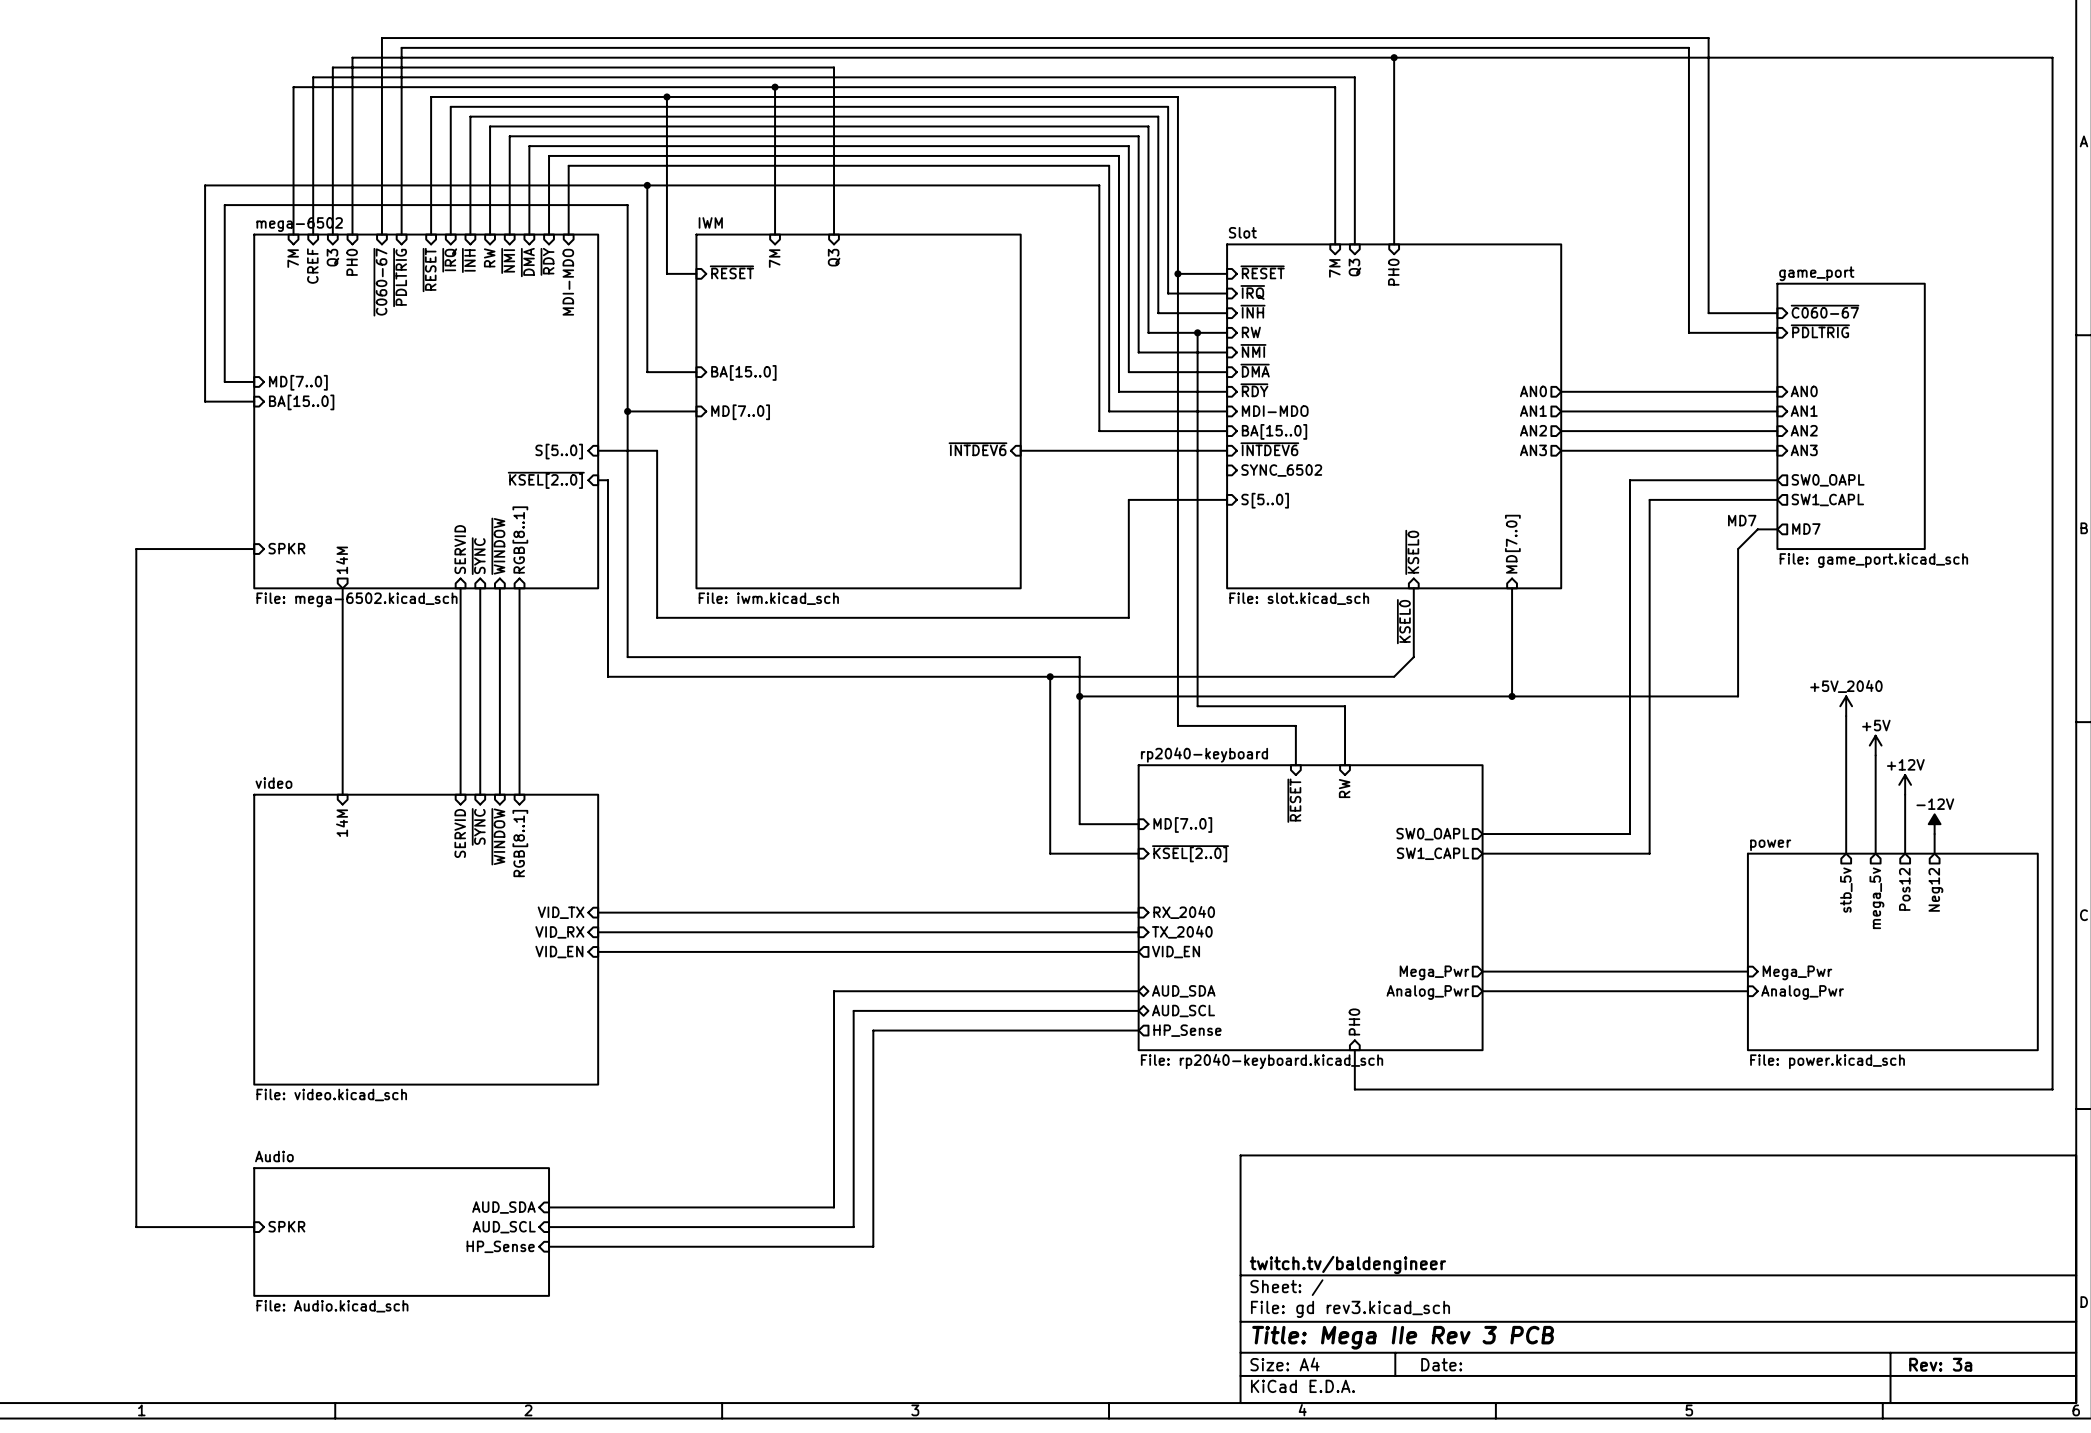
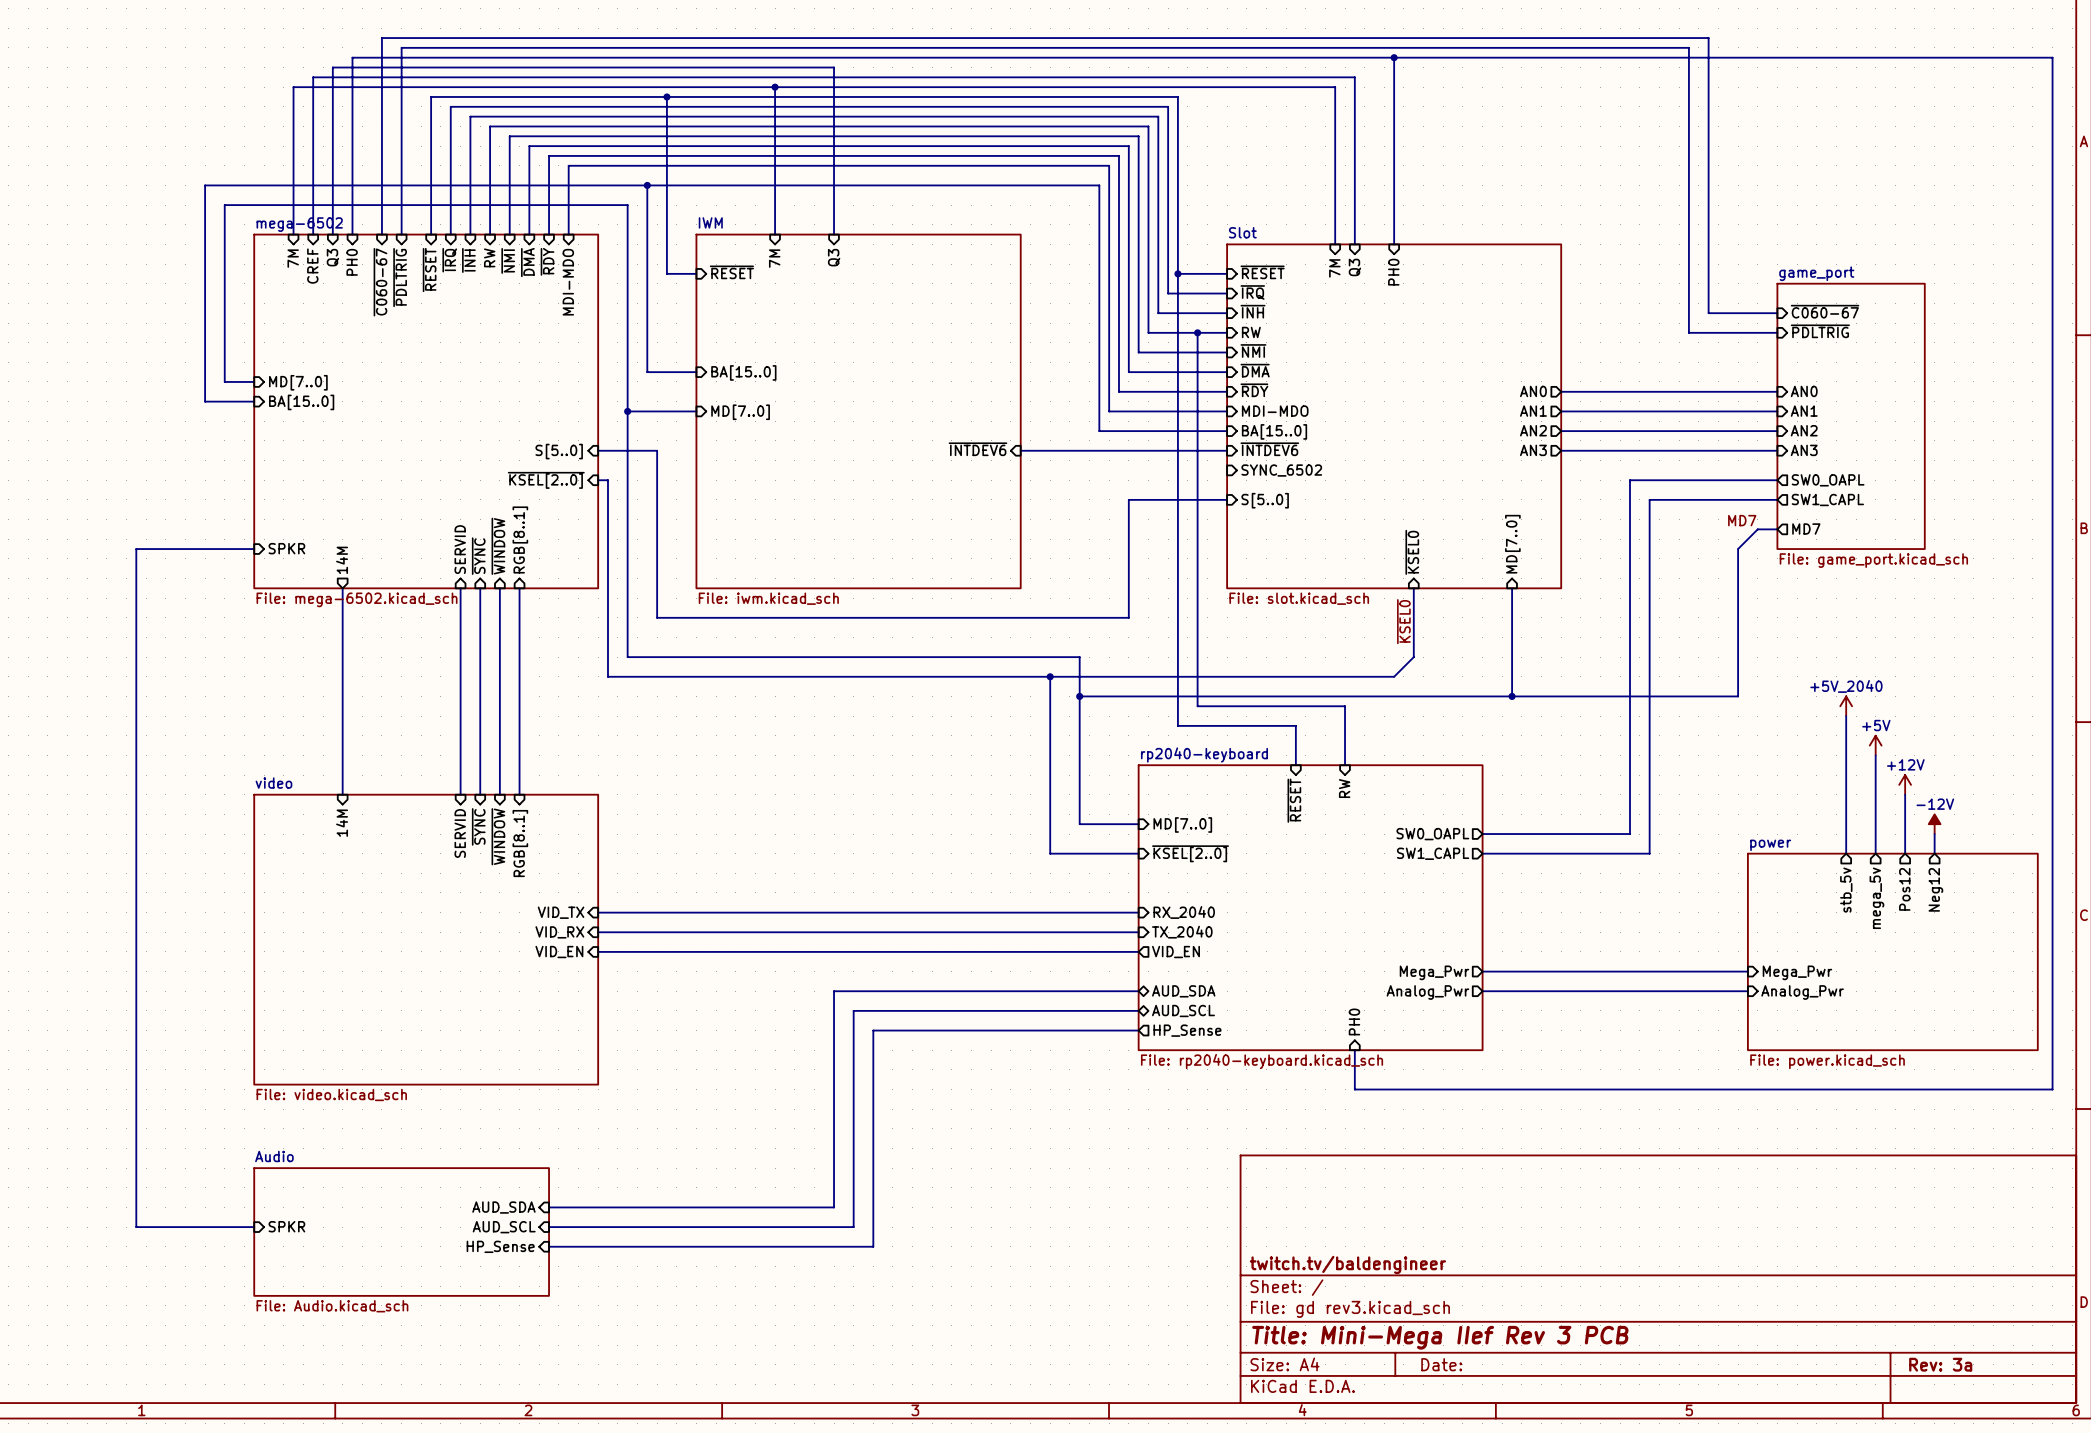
title block: Title: Mega IIe Rev 3 PCB (1403, 1337) -> Title: Mini-Mega IIef Rev 3 PCB (1440, 1337)

